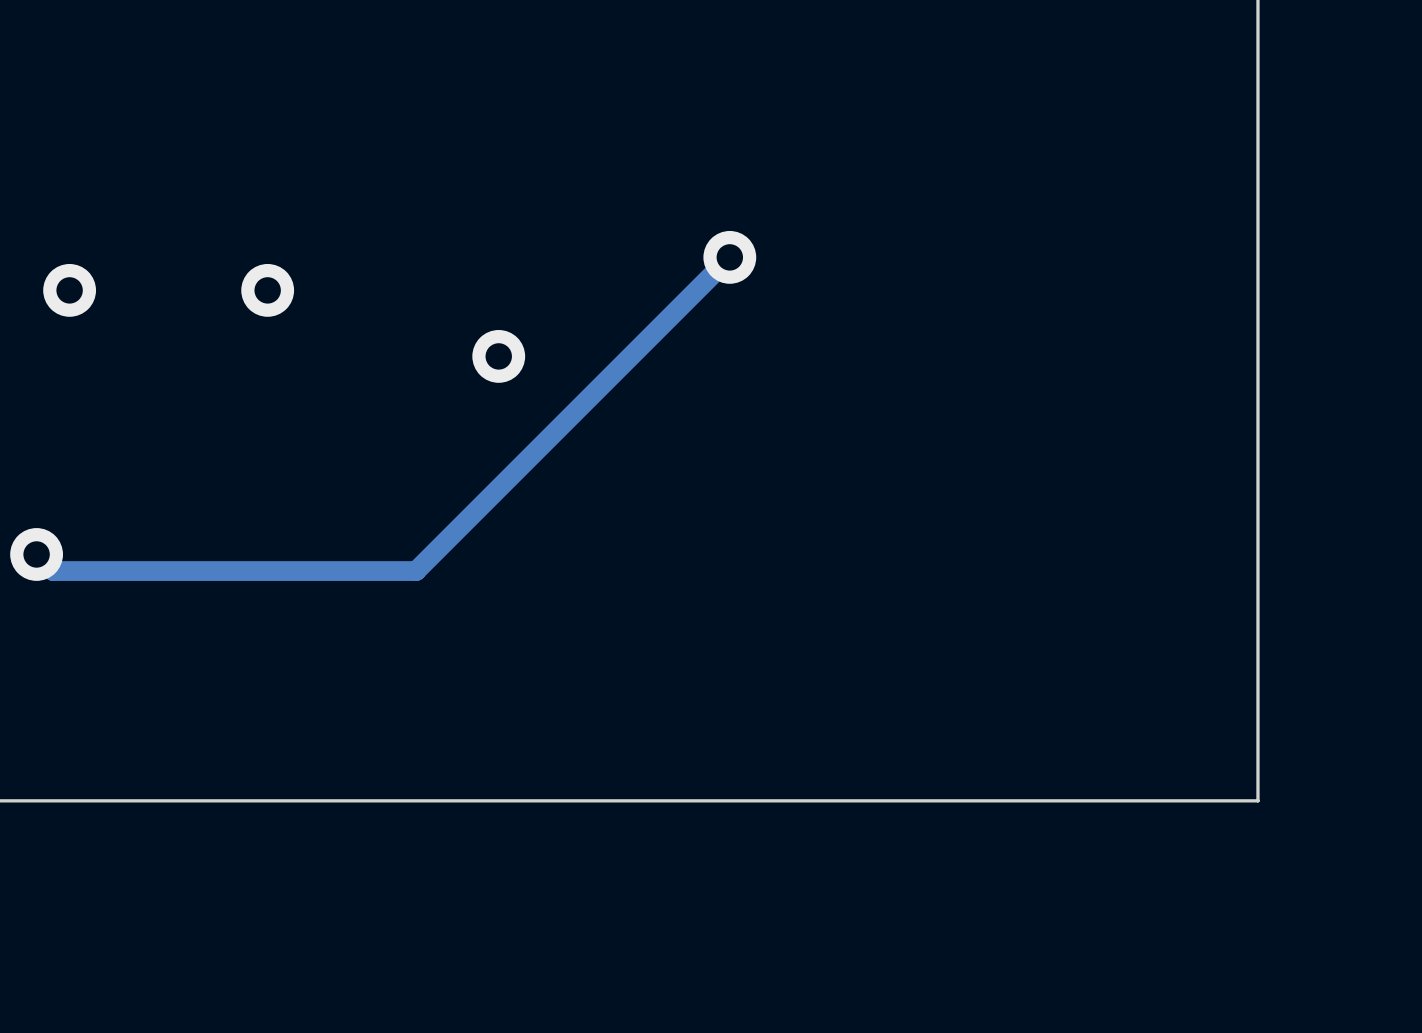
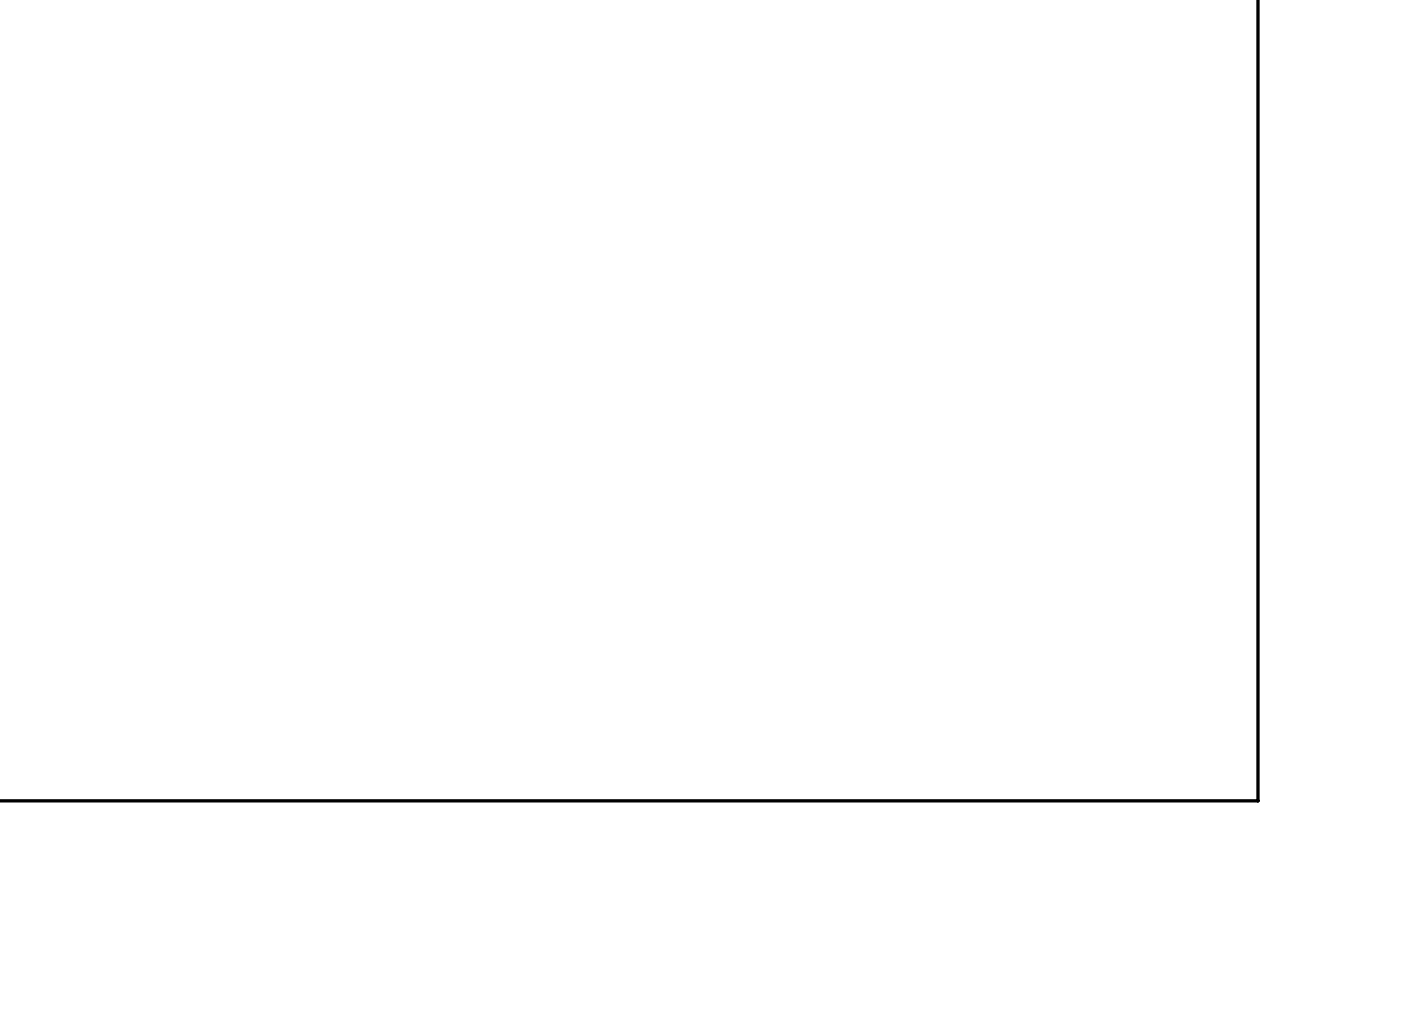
track: (729, 257) (416, 571) (53, 571) (36, 554) -> none
via: (729, 257) -> none
via: (69, 290) -> none
via: (267, 290) -> none
via: (498, 356) -> none
via: (36, 554) -> none

